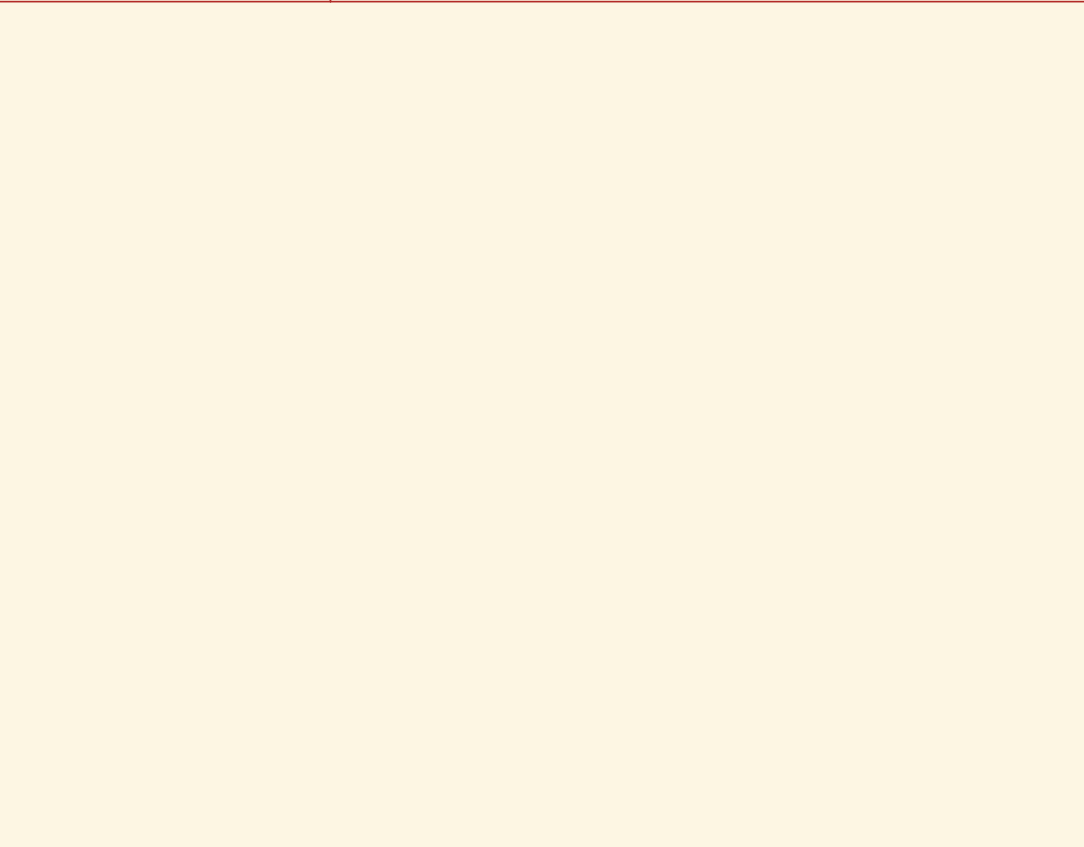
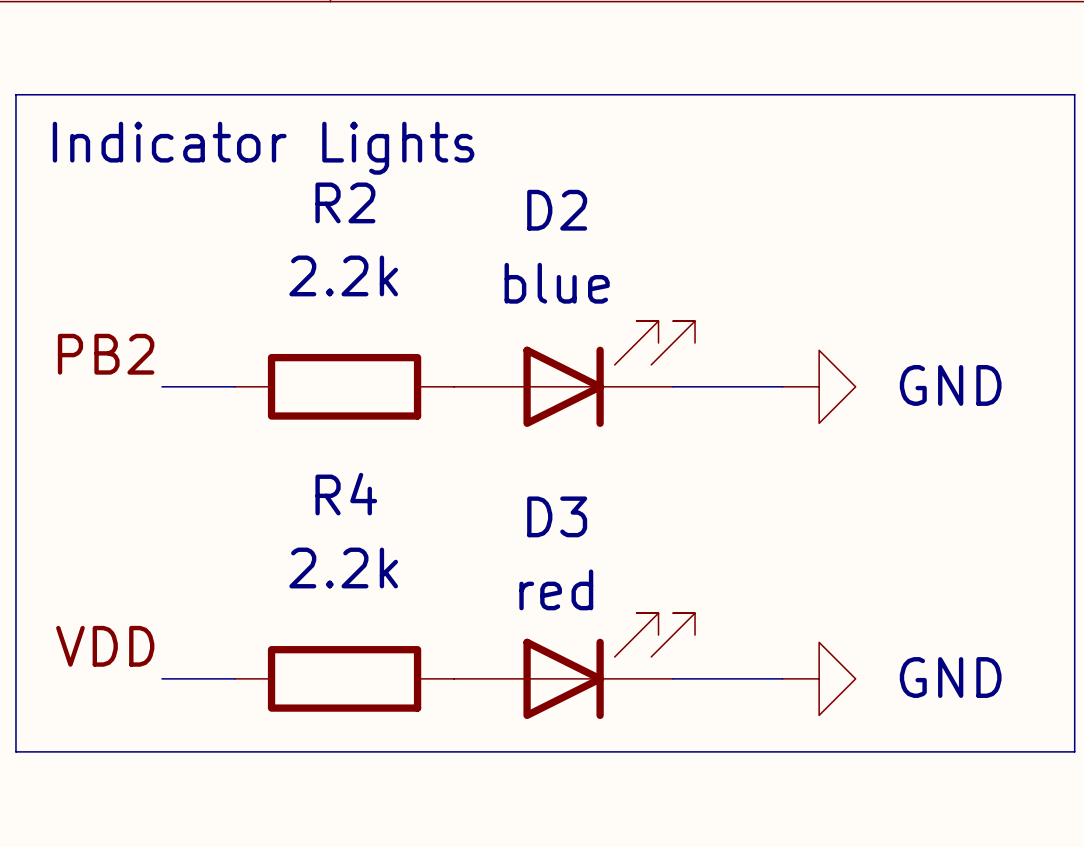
line: none -> (15, 94) (1074, 94) (1074, 751) (15, 751) (15, 94)
text: none -> Indicator Lights (263, 148)
label: none -> PB2 (106, 354)
D2: none -> blue (574, 374)
wire: none -> (162, 386) (235, 386)
R2: none -> 2.2k (344, 386)
wire: none -> (673, 386) (782, 386)
power symbol: none -> GND (819, 386)
label: none -> VDD (105, 646)
D3: none -> red (574, 666)
wire: none -> (162, 678) (235, 678)
R4: none -> 2.2k (344, 678)
wire: none -> (673, 678) (782, 678)
power symbol: none -> GND (819, 678)

